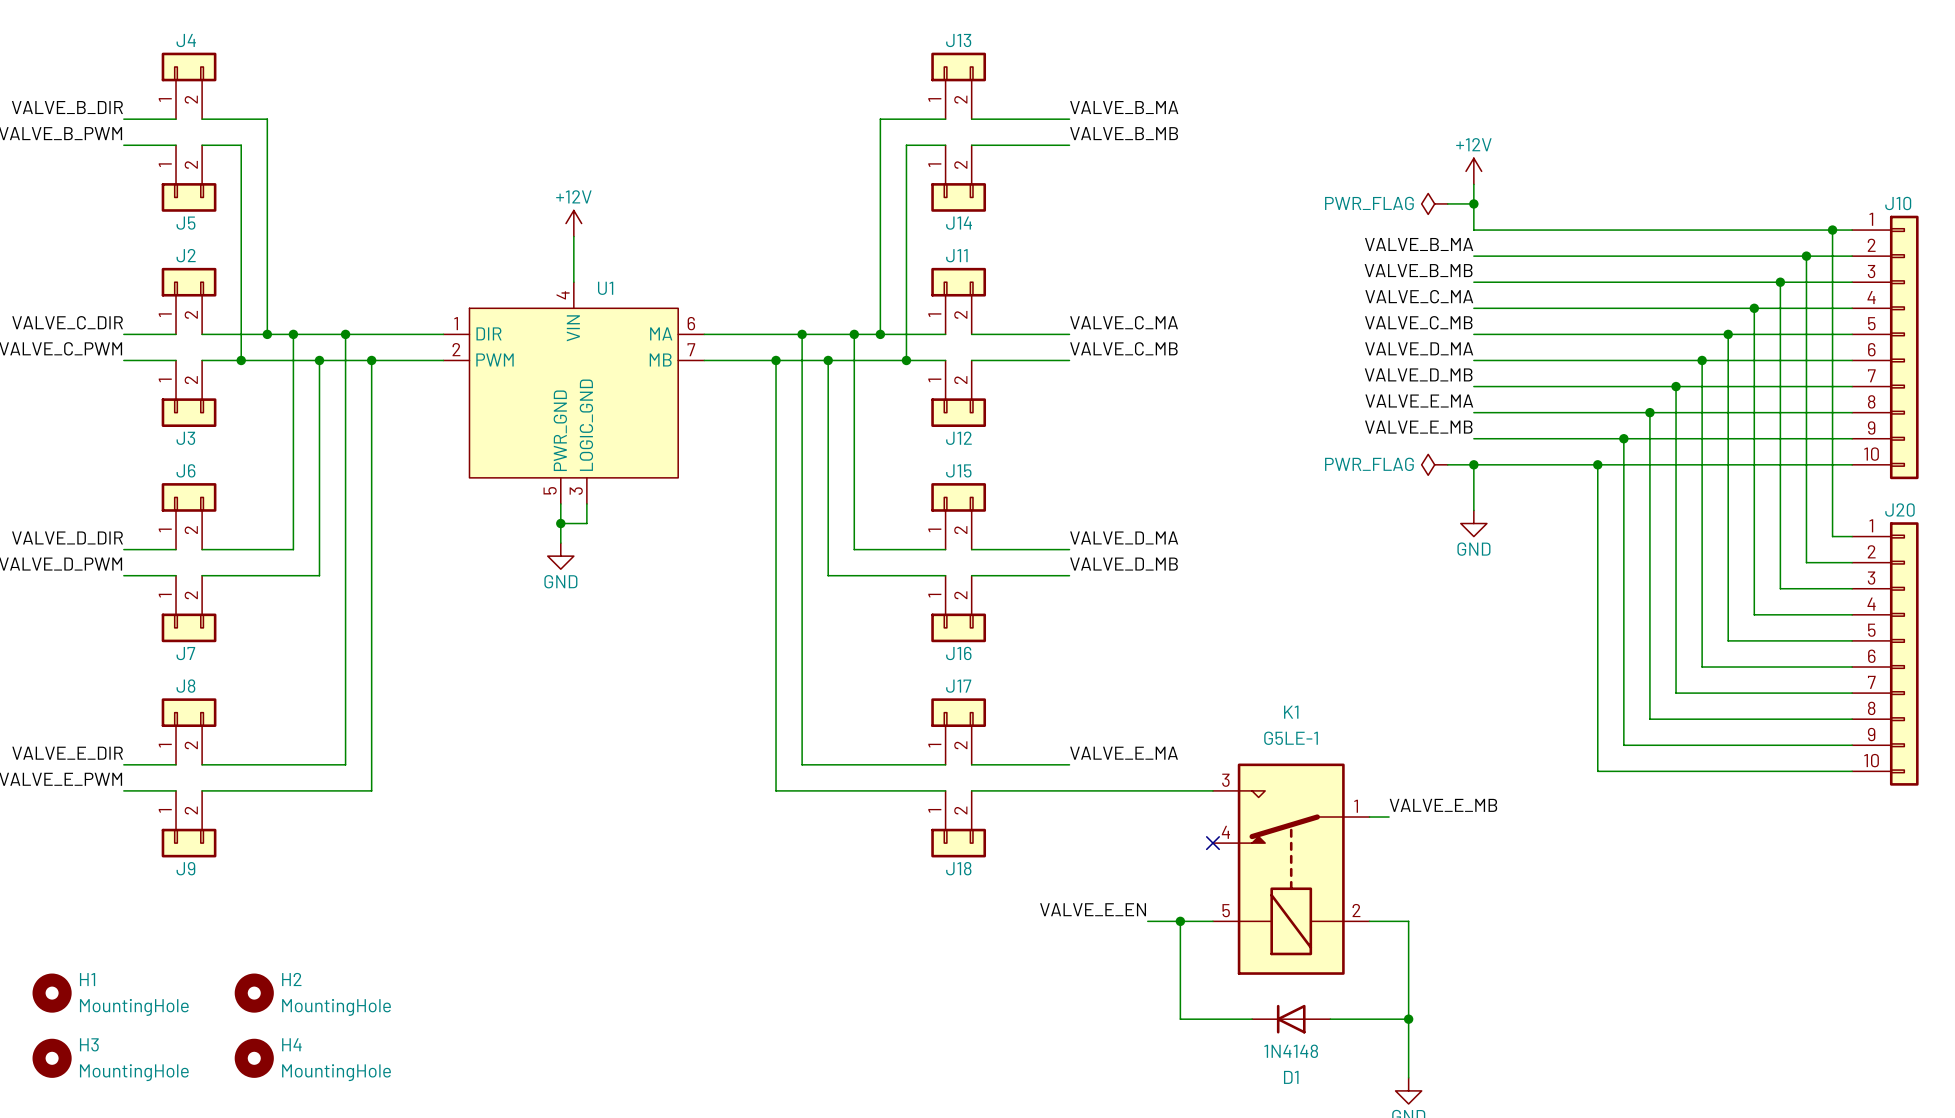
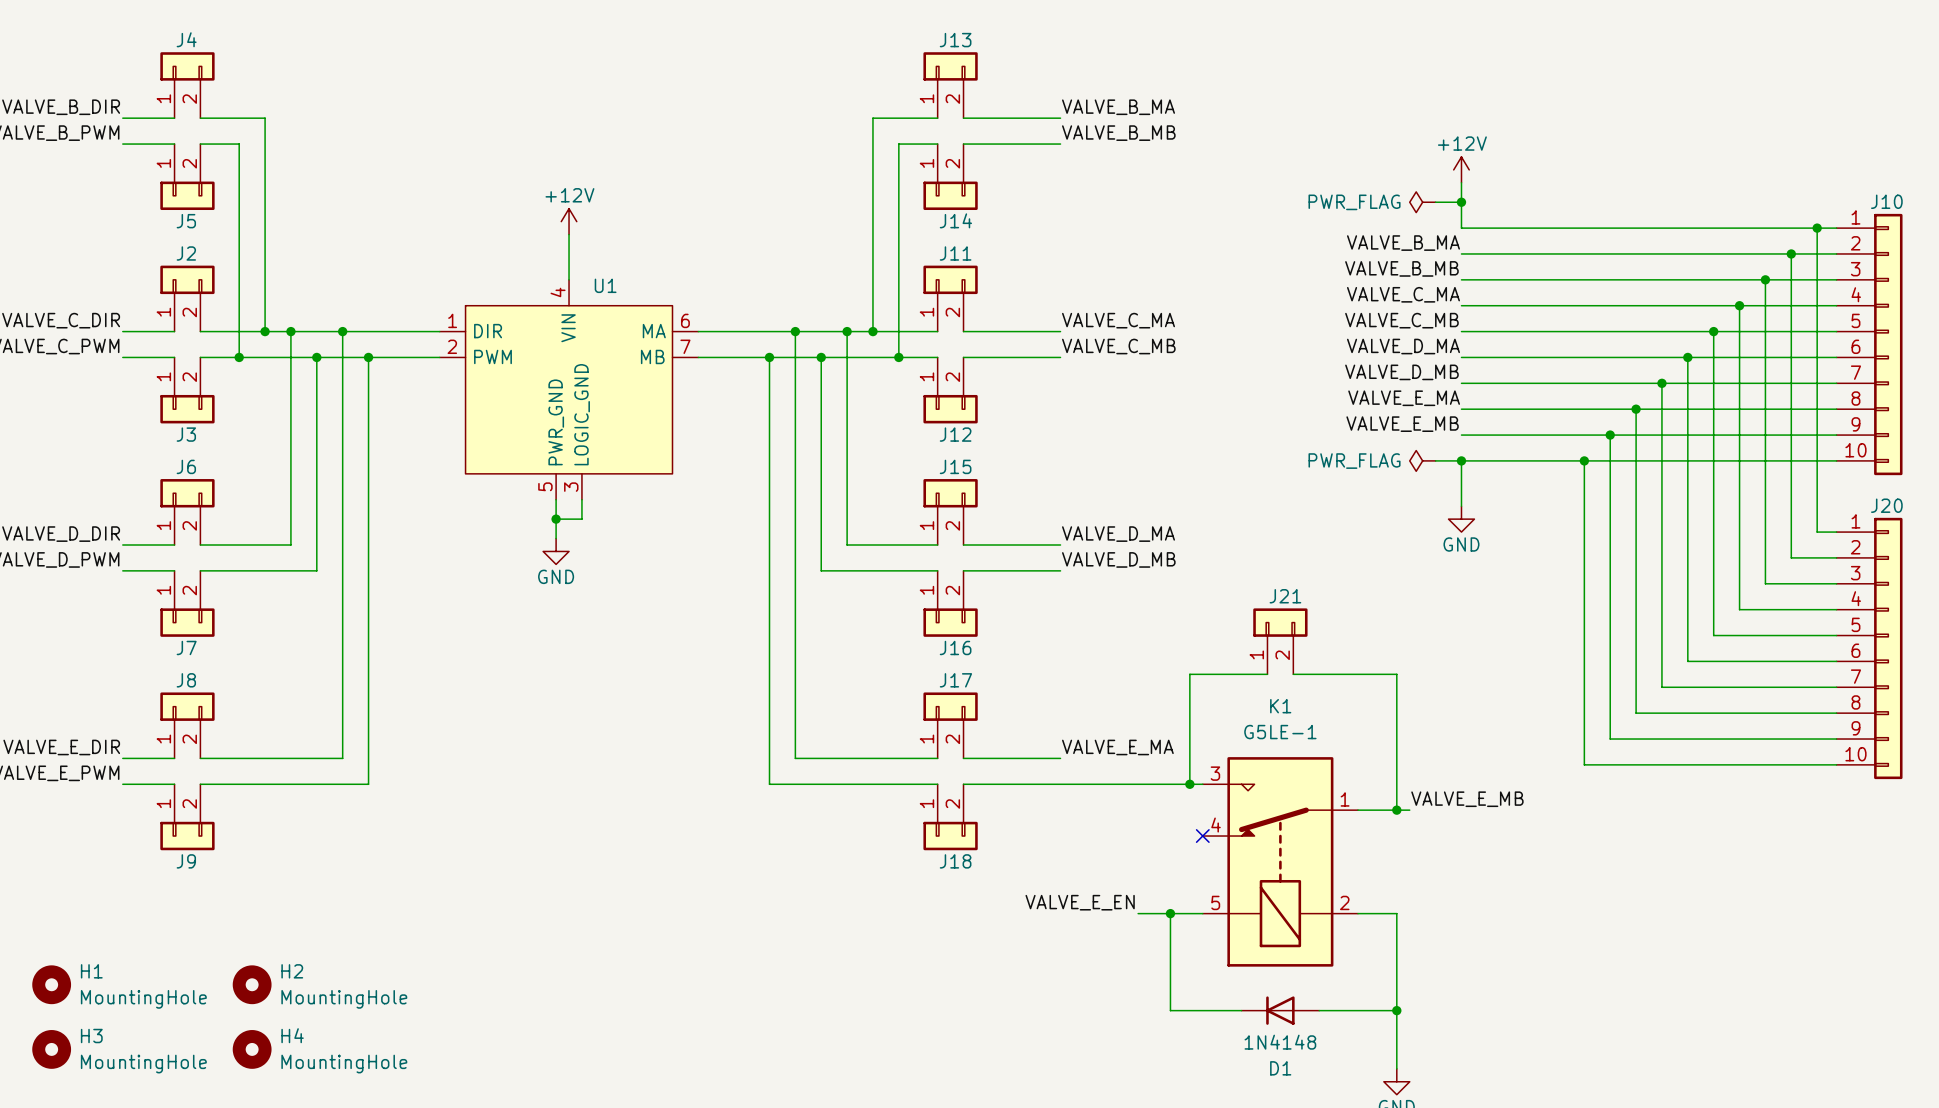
J21: none -> (1280, 641)
wire: none -> (1267, 674) (1189, 674) (1189, 784)
wire: none -> (1293, 674) (1396, 674) (1396, 810)
junction: none -> (1189, 784)
label position: VALVE_E_MB (1443, 805) -> VALVE_E_MB (1467, 799)
wire: none -> (1377, 810) (1409, 810)
junction: none -> (1396, 810)

